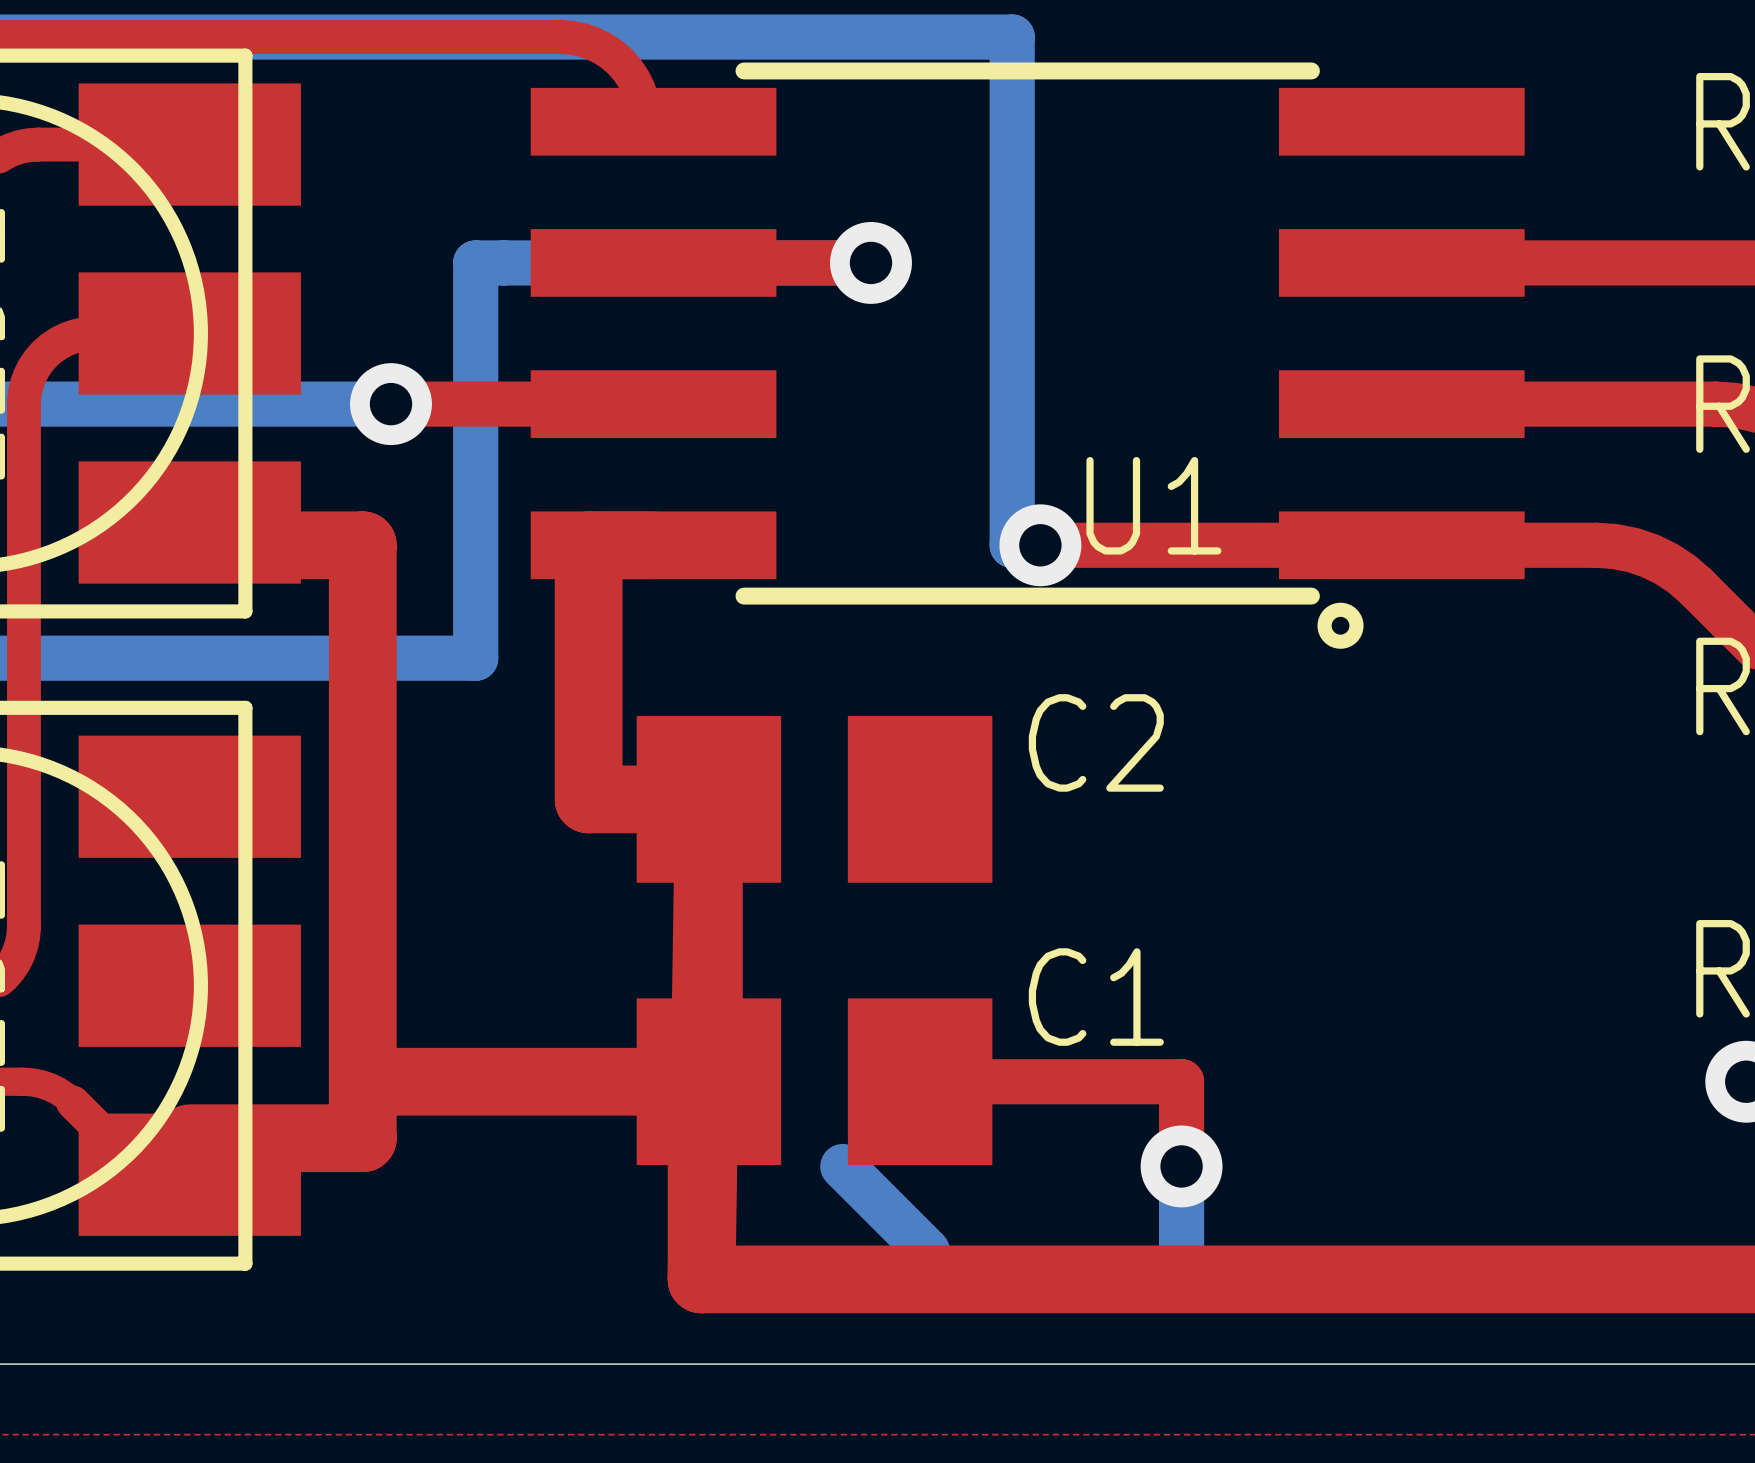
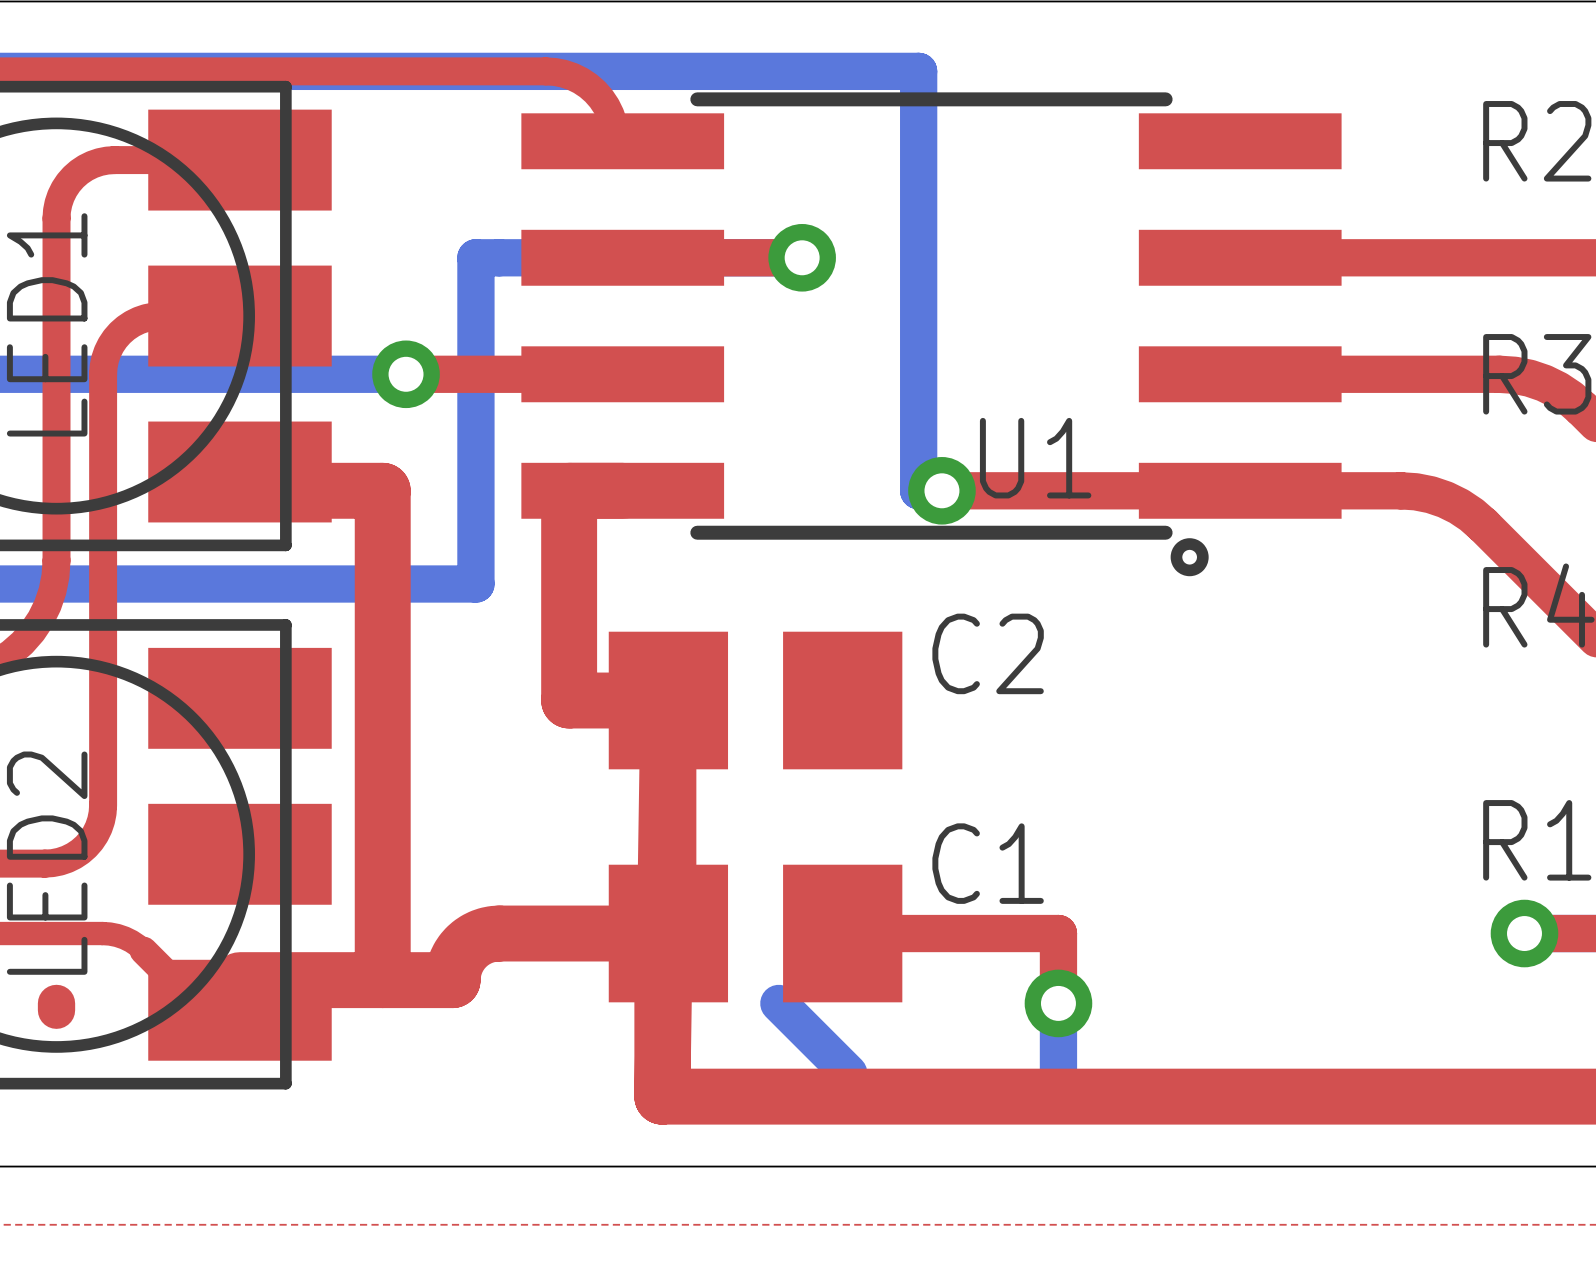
top track: (362, 1081) (503, 1081) -> (382, 980) (452, 980) (456, 962) (466, 947) (481, 937) (499, 933)

